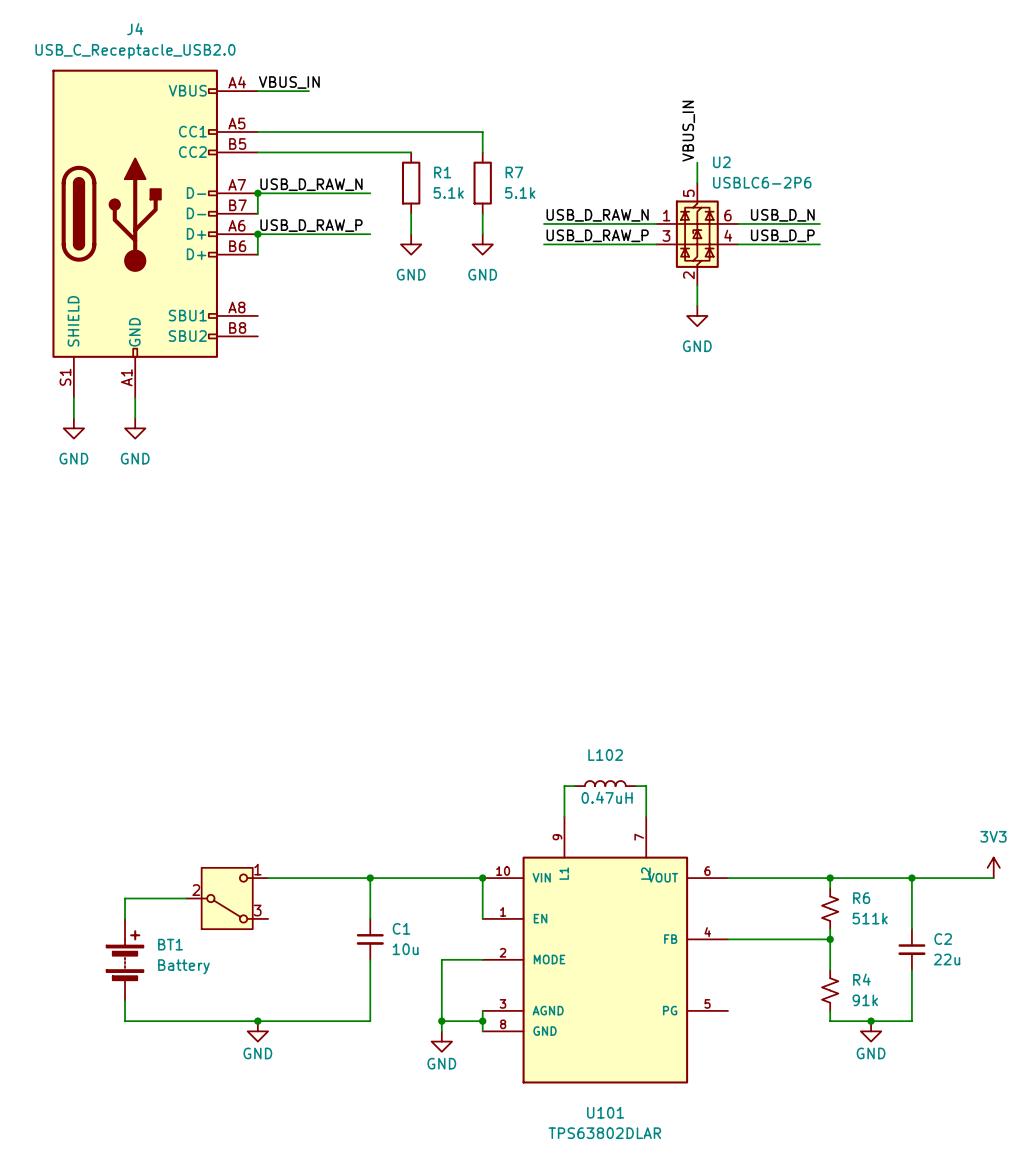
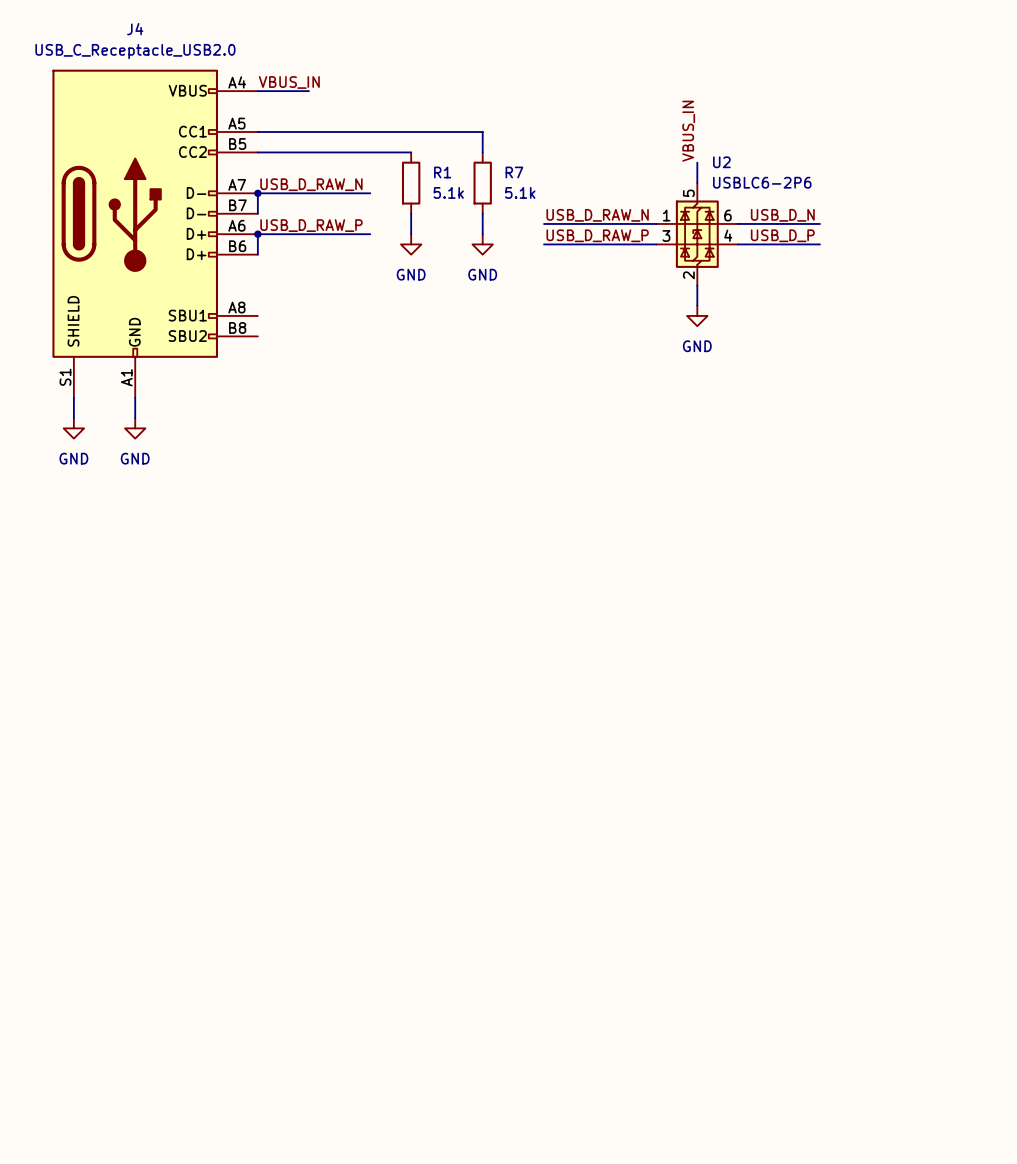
L102: 0.47uH (605, 783) -> none
wire: (574, 786) (564, 786) (564, 816) -> none
wire: (636, 786) (646, 786) (646, 816) -> none
power symbol: 3V3 (993, 867) -> none
wire: (268, 878) (482, 878) (482, 918) -> none
wire: (370, 878) (370, 918) -> none
junction: (370, 878) -> none
junction: (482, 878) -> none
wire: (727, 878) (993, 878) -> none
wire: (830, 878) (830, 888) -> none
junction: (830, 878) -> none
wire: (911, 878) (911, 929) -> none
junction: (911, 878) -> none
wire: (186, 898) (125, 898) (125, 918) -> none
part: (227, 898) -> none
R6: 511k (830, 908) -> none
wire: (830, 929) (830, 970) -> none
C1: 10u (370, 939) -> none
wire: (727, 939) (830, 939) -> none
junction: (830, 939) -> none
C2: 22u (911, 949) -> none
U101: TPS63802DLAR (605, 950) -> none
BT1: Battery (125, 959) -> none
wire: (370, 959) (370, 1021) (125, 1021) (125, 1000) -> none
wire: (482, 959) (441, 959) (441, 1031) -> none
wire: (911, 970) (911, 1021) (830, 1021) (830, 1010) -> none
R4: 91k (830, 990) -> none
wire: (482, 1010) (482, 1031) -> none
junction: (257, 1021) -> none
wire: (441, 1021) (482, 1021) -> none
junction: (441, 1021) -> none
junction: (482, 1021) -> none
junction: (871, 1021) -> none
power symbol: GND (257, 1031) -> none
power symbol: GND (871, 1031) -> none
power symbol: GND (441, 1041) -> none

